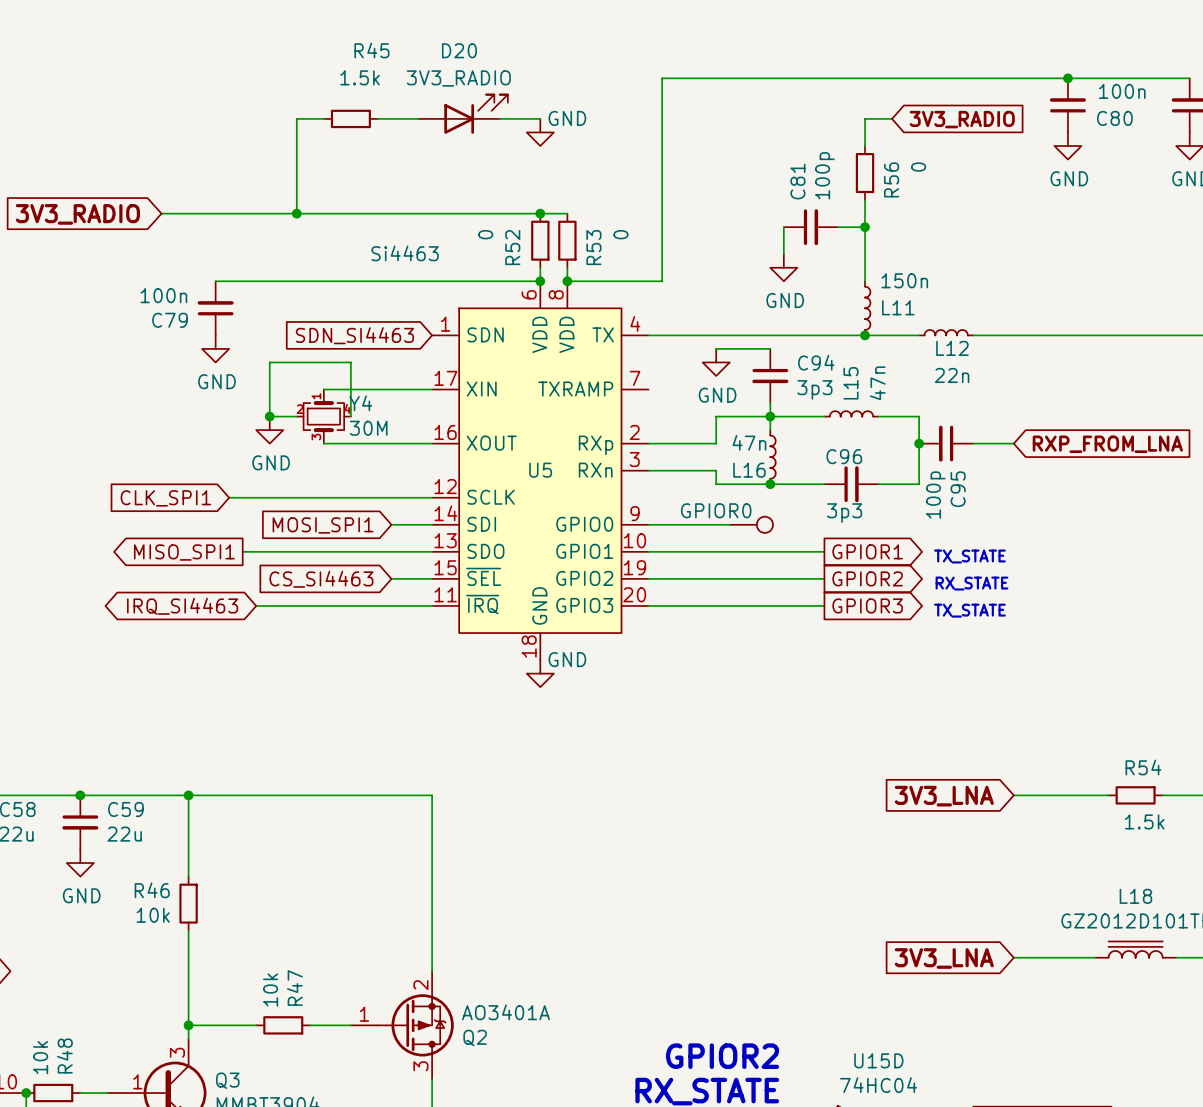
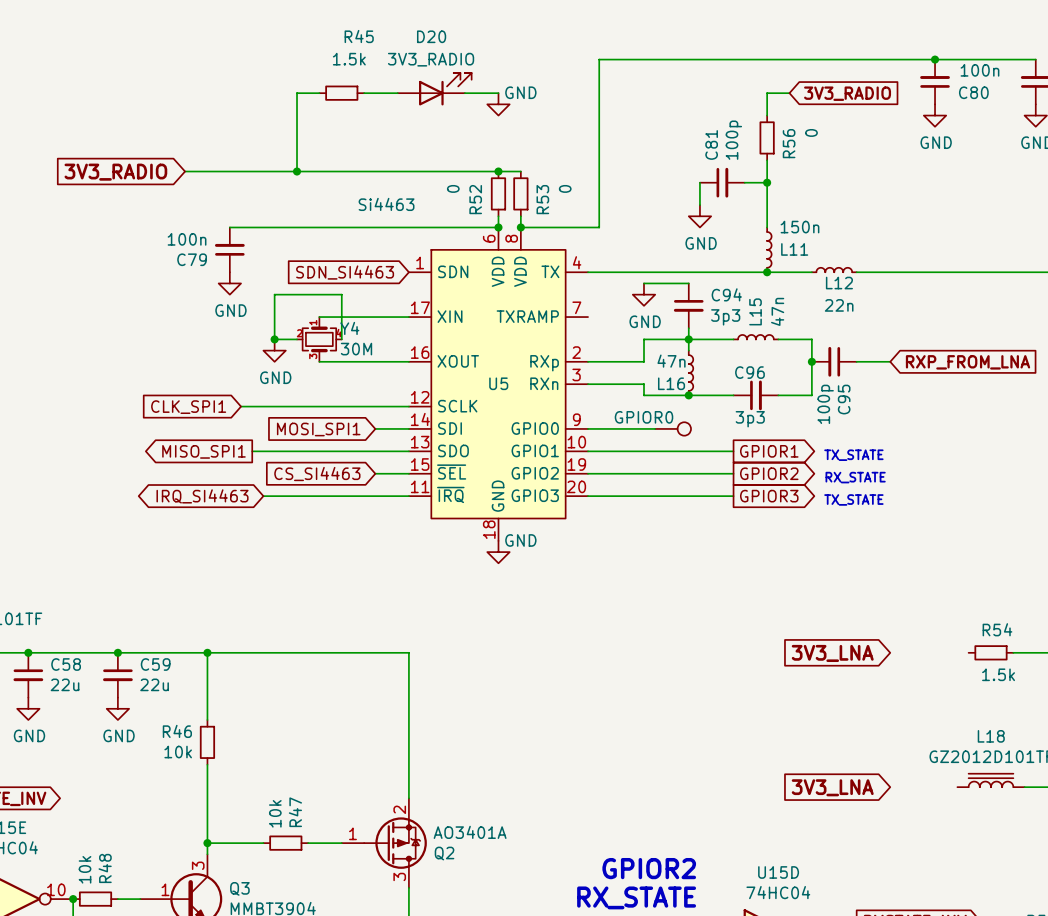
wire: (1013, 795) (1108, 795) -> none
wire: (1013, 957) (1095, 957) -> none

